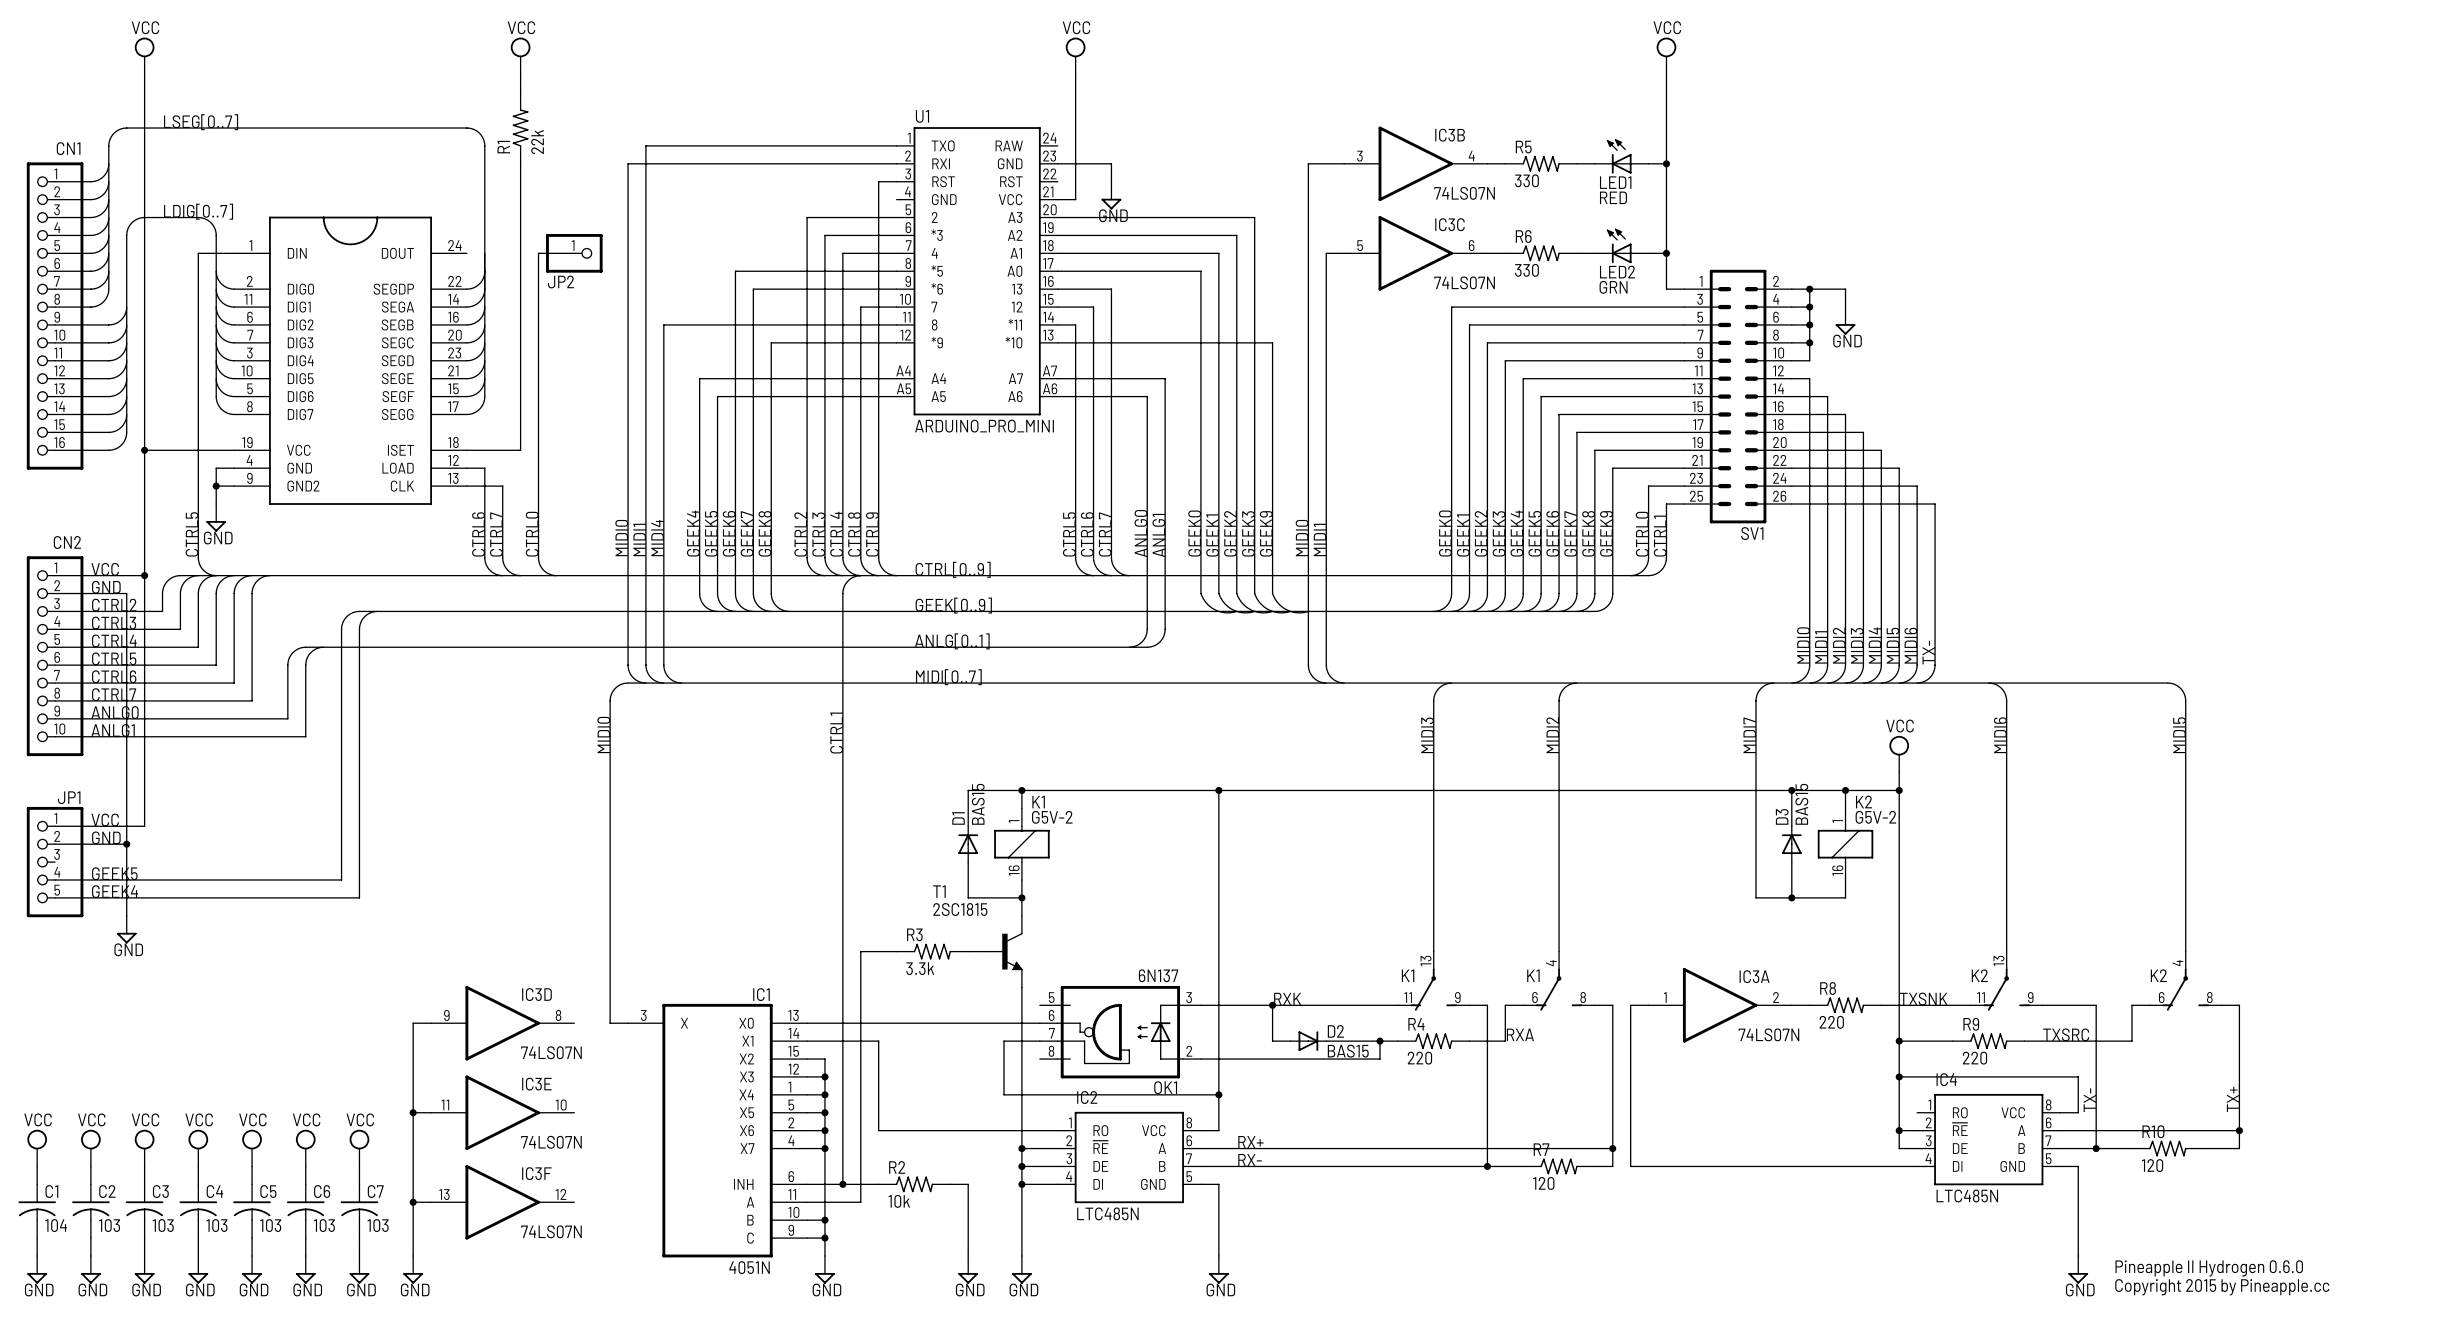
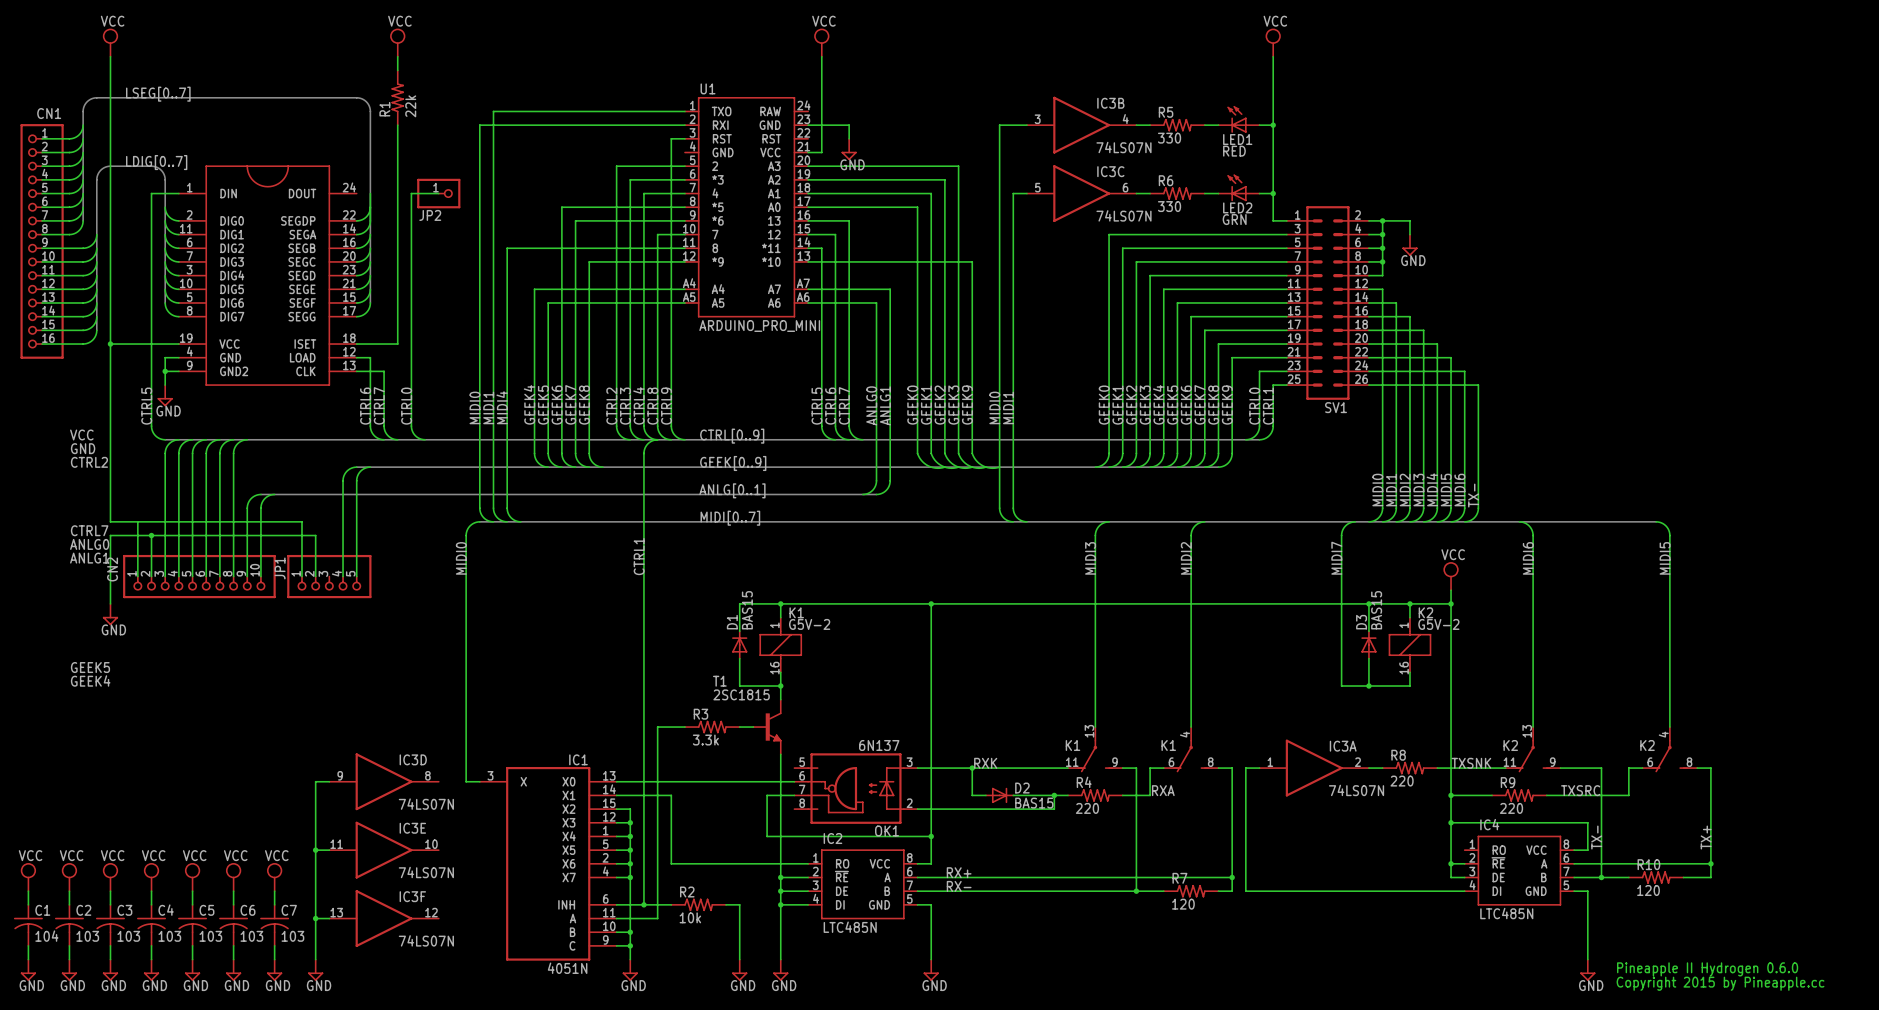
wire: (55, 575) (144, 575) -> none
junction: (144, 575) -> none
bus: (180, 575) (216, 575) -> none
wire: (180, 575) (171, 578) (164, 584) (162, 591) (162, 611) (55, 611) -> none
wire: (198, 575) (187, 579) (181, 588) (180, 629) (55, 629) -> none
wire: (216, 575) (205, 579) (198, 588) (198, 647) (55, 647) -> none
wire: none -> (219, 439) (210, 443) (206, 451) (206, 576)
wire: (55, 593) (126, 593) (126, 915) -> none
bus: (359, 611) (466, 611) -> none
wire: (359, 611) (348, 615) (342, 624) (341, 665) -> (274, 494) (264, 498) (260, 508)
wire: (377, 611) (364, 616) (359, 629) (359, 897) (55, 897) -> none
wire: none -> (356, 467) (347, 471) (343, 479) (343, 576)
wire: none -> (370, 467) (360, 471) (356, 479) (356, 576)
label: CTRL3 (114, 623) -> none
label: CTRL4 (114, 640) -> none
bus: (305, 647) (341, 647) -> none
wire: (305, 647) (293, 652) (287, 665) -> (233, 439) (225, 442) (220, 449) (219, 508)
wire: (323, 647) (310, 652) (305, 665) -> (247, 439) (238, 442) (234, 449) (233, 508)
wire: none -> (260, 494) (251, 498) (247, 506) (247, 576)
CN2 rotation: 0° (55, 656) -> 90° counterclockwise (199, 576)
CN2 position: (55, 656) -> (199, 576)
label: CTRL5 (114, 658) -> none
wire: (55, 665) (216, 665) -> (165, 576) (165, 508)
label: CTRL6 (114, 676) -> none
wire: (55, 683) (144, 683) (144, 700) (55, 700) -> none
wire: none -> (137, 521) (137, 576)
wire: none -> (151, 535) (151, 576)
junction: none -> (151, 535)
wire: (55, 718) (287, 718) -> (219, 576) (219, 549)
wire: (55, 736) (305, 736) -> (233, 576) (233, 562)
wire: none -> (178, 576) (178, 521) (301, 521) (301, 576)
wire: none -> (192, 576) (192, 535) (315, 535) (315, 576)
wire: (341, 754) (341, 879) (55, 879) -> none
wire: (144, 790) (144, 826) (55, 826) -> none
label: VCC (105, 820) -> none
label: GND (106, 837) -> none
wire: (55, 844) (126, 844) -> none
junction: (126, 844) -> none
JP1 rotation: 0° (55, 862) -> 90° counterclockwise (329, 576)
JP1 position: (55, 862) -> (329, 576)
power symbol position: GND (126, 929) -> GND (110, 614)

